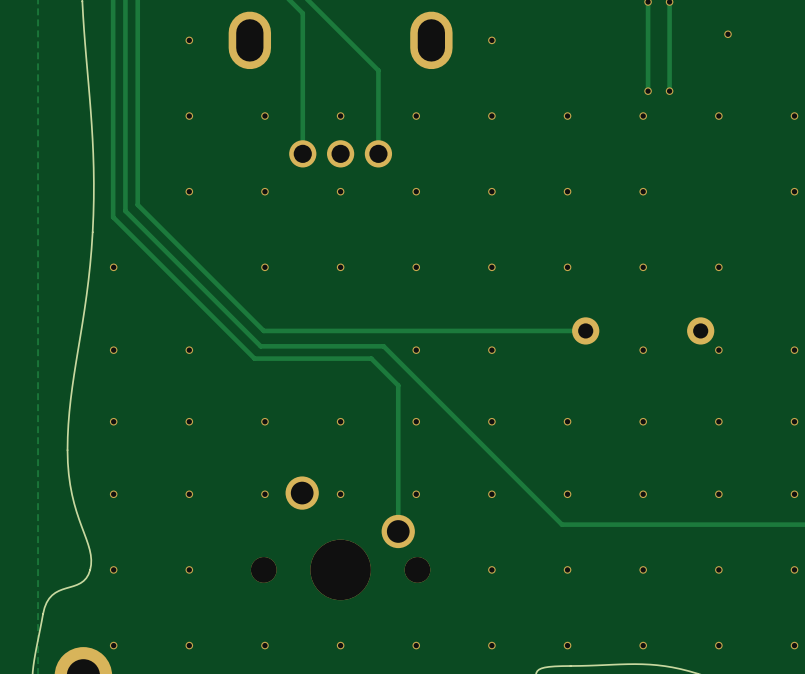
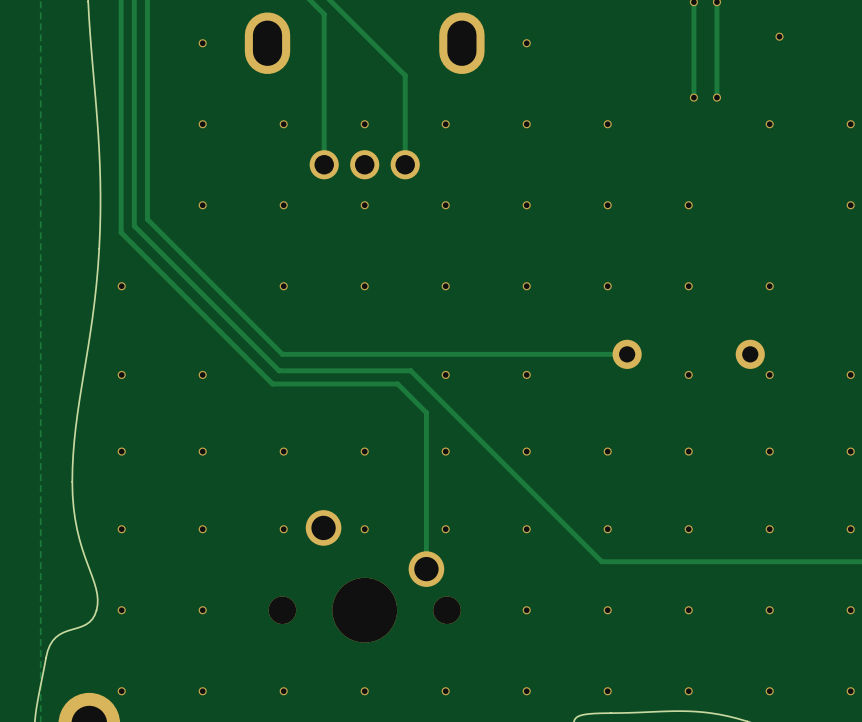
via: (643, 116) -> none

